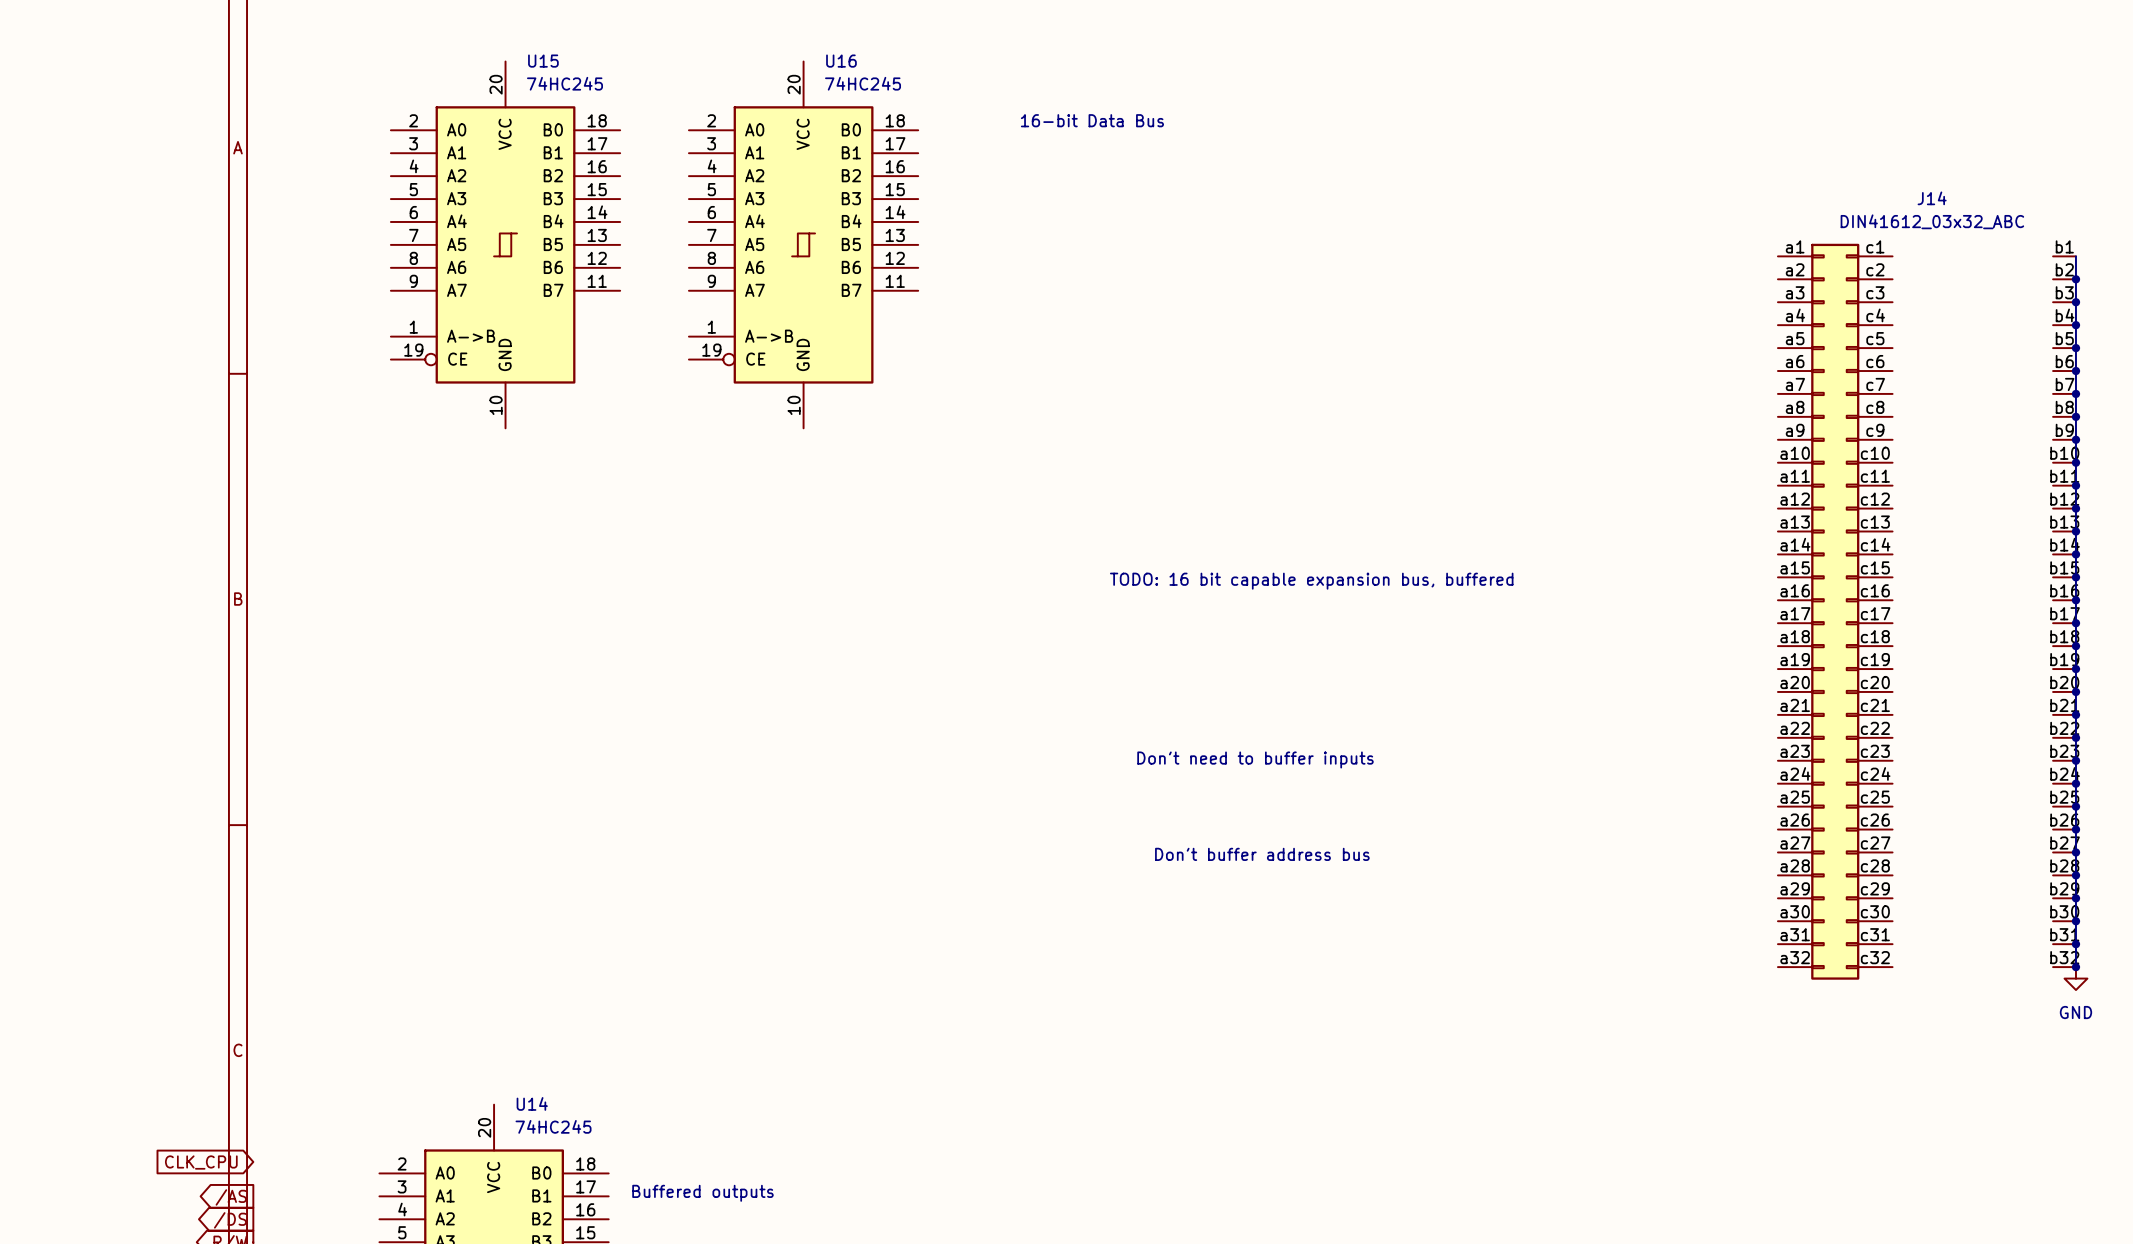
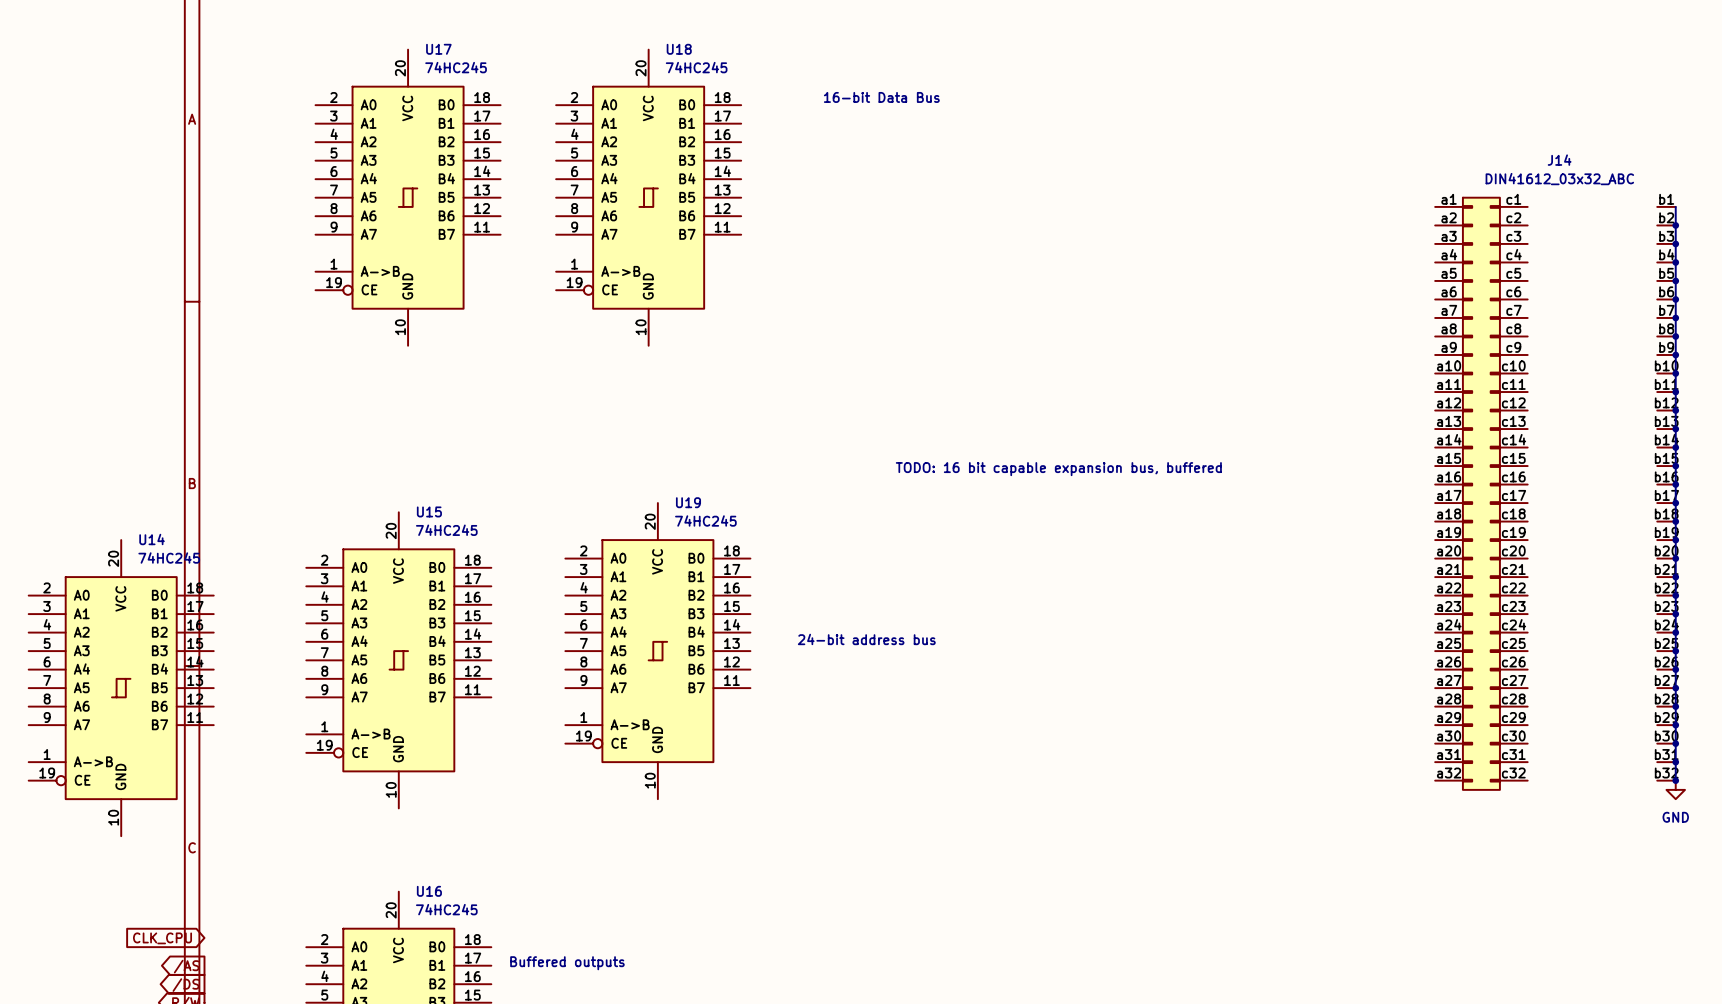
U15 name: U15 (543, 61) -> U17 (438, 49)
U16 name: U16 (841, 61) -> U18 (679, 49)
text: Don't need to buffer inputs (1255, 759) -> none
text: none -> 24-bit address bus (866, 639)
U19: none -> 74HC245 (657, 651)
U15: none -> 74HC245 (398, 660)
U14: none -> 74HC245 (121, 688)
text: Don't buffer address bus (1262, 854) -> none
U14 name: U14 (532, 1103) -> U16 (429, 891)

